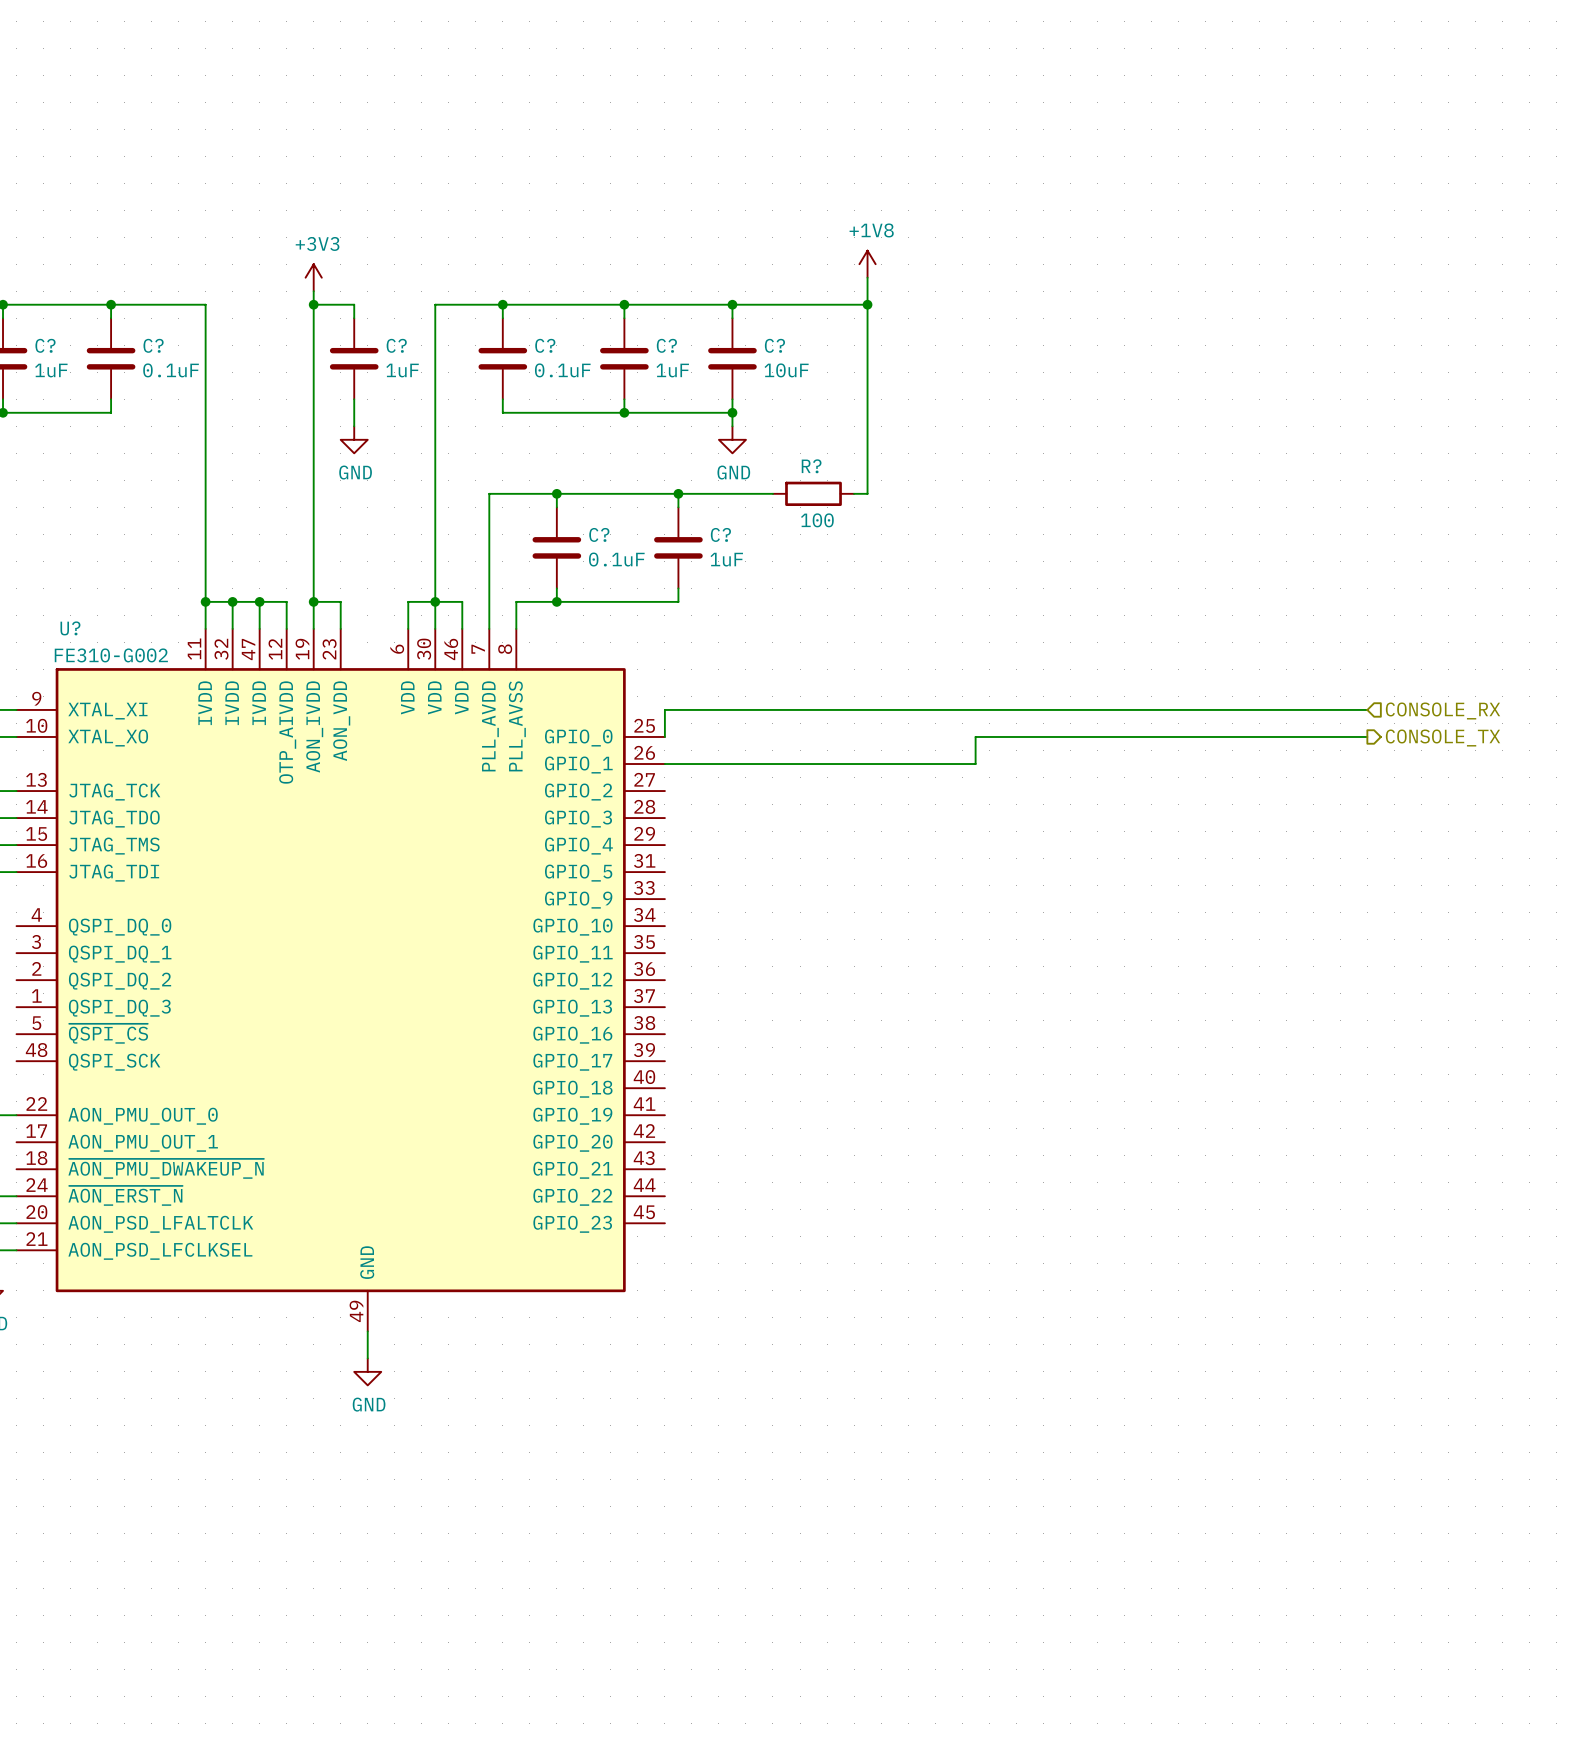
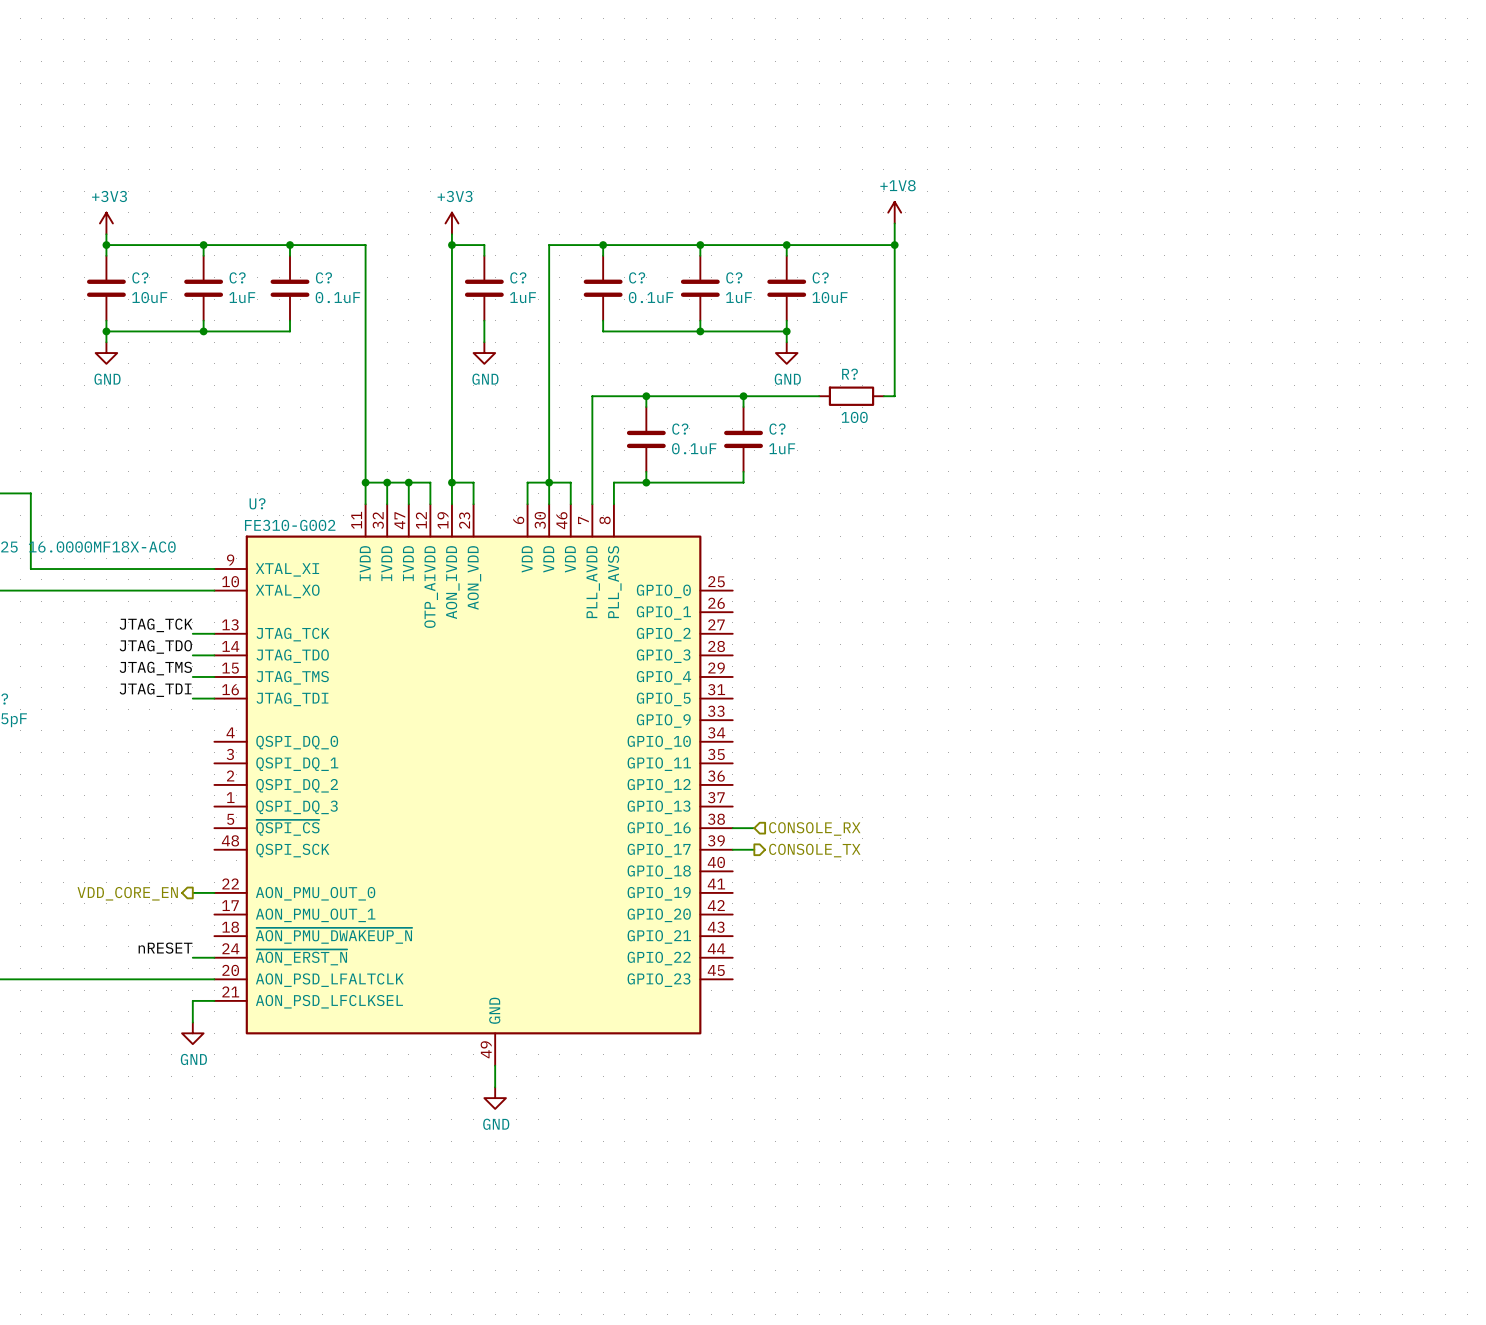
wire: (1367, 709) (664, 709) (664, 736) -> none
hierarchical label: CONSOLE_RX (1443, 710) -> none
wire: (1367, 736) (975, 736) (975, 764) (664, 764) -> none
hierarchical label: CONSOLE_TX (1443, 738) -> none
wire: none -> (732, 828) (754, 828)
hierarchical label: none -> CONSOLE_RX (814, 828)
wire: none -> (732, 849) (754, 849)
hierarchical label: none -> CONSOLE_TX (814, 850)

